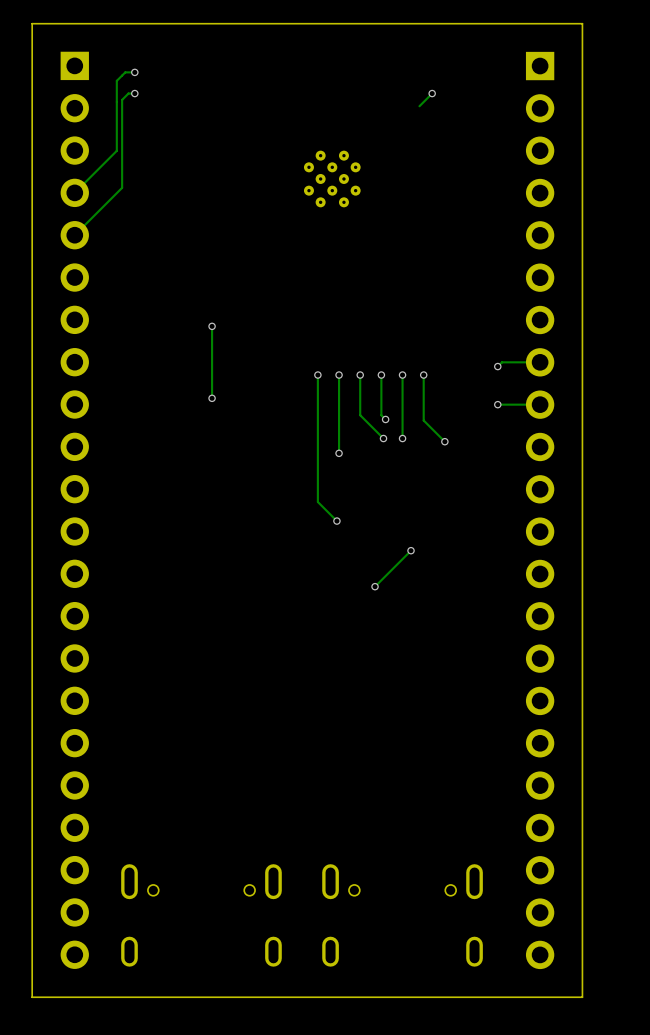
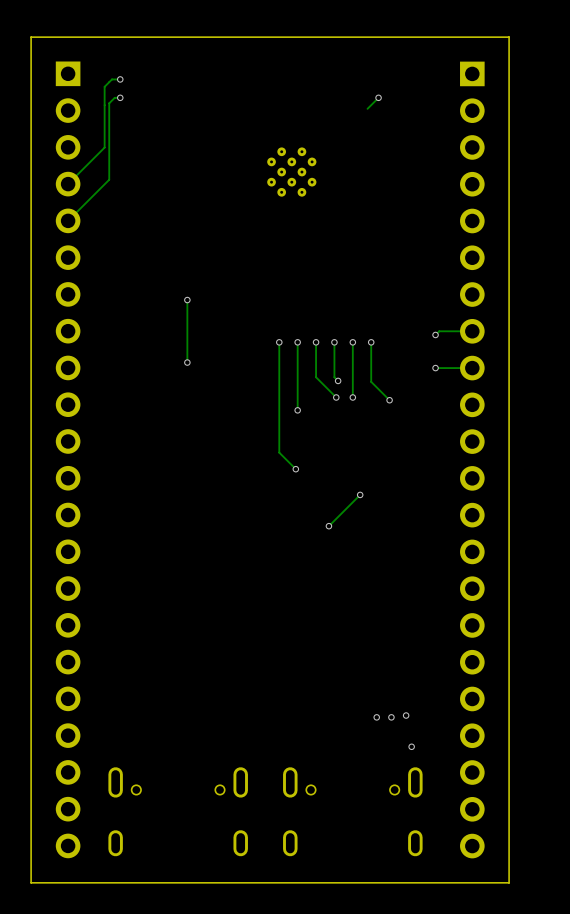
via: none -> (406, 715)
via: none -> (376, 717)
via: none -> (391, 717)
via: none -> (411, 746)

